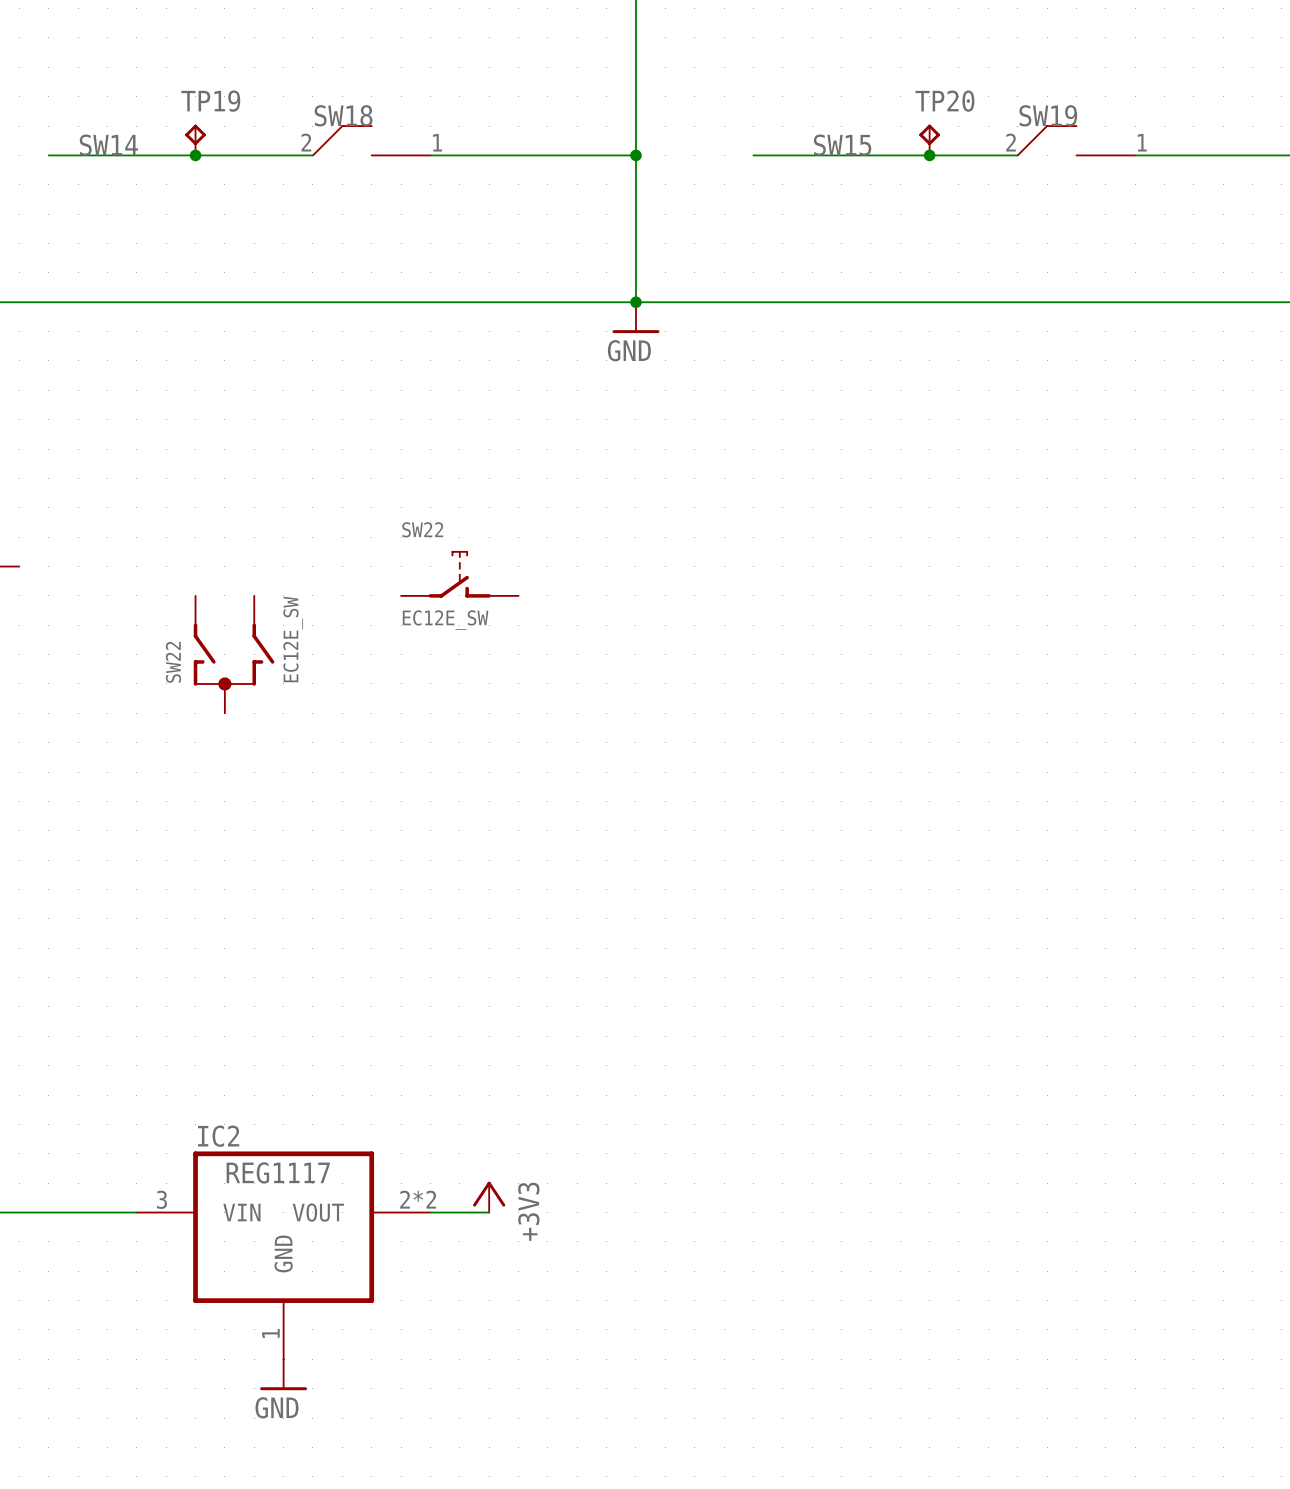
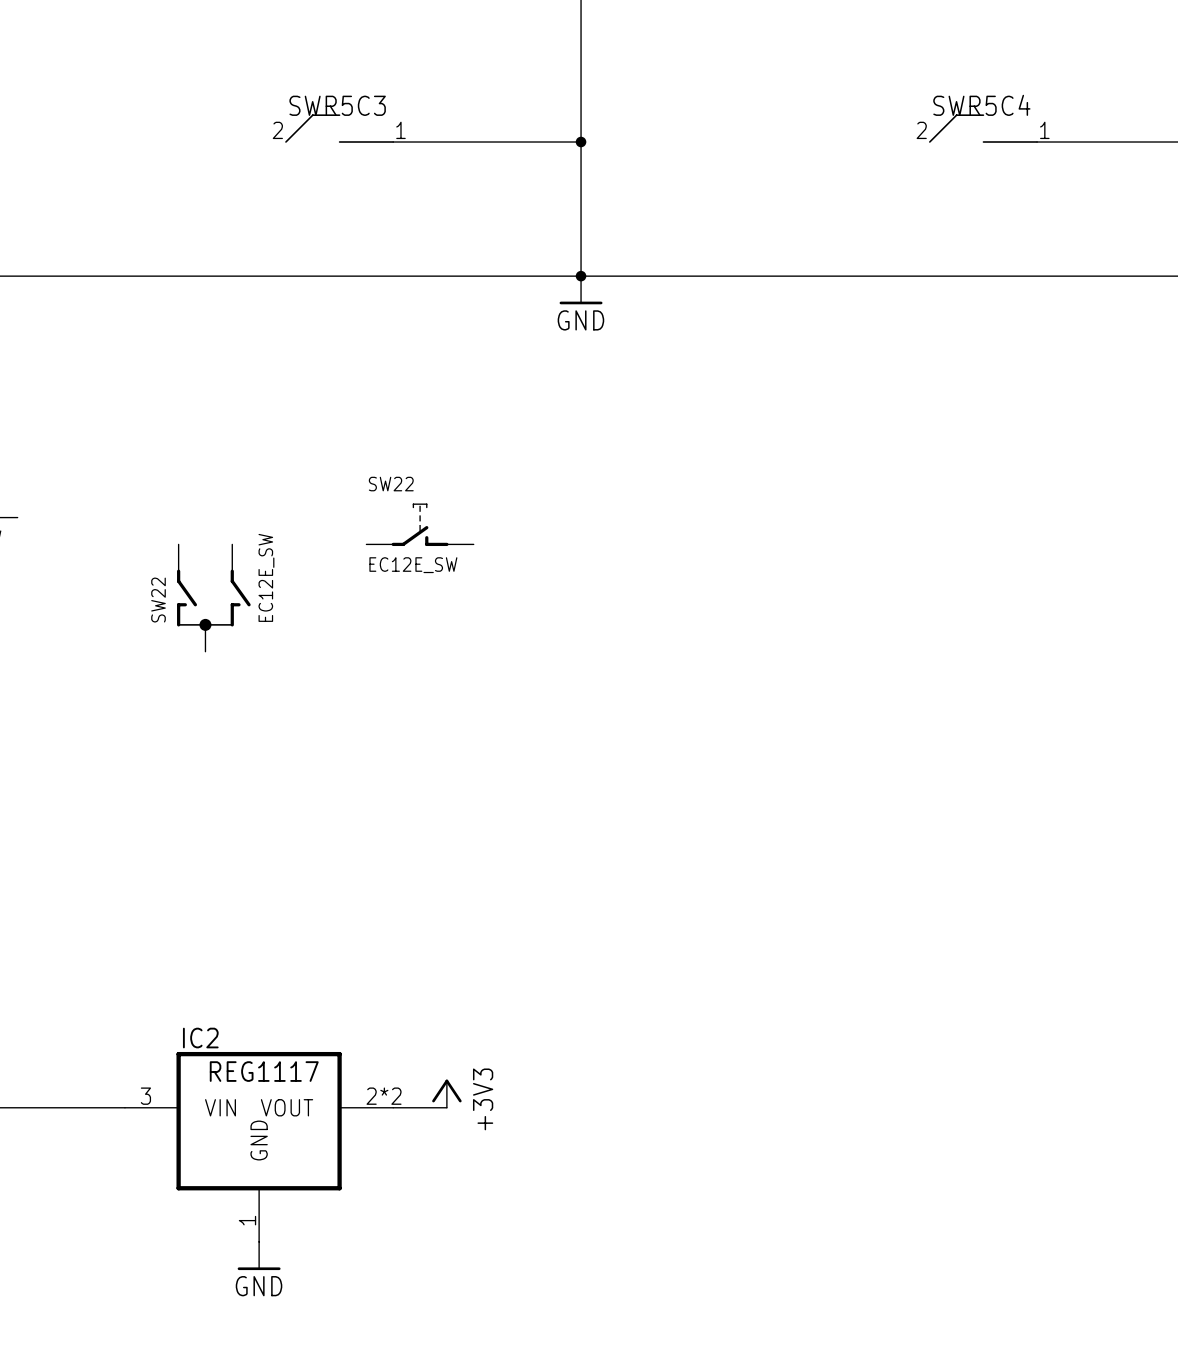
SW18 name: SW18 (343, 115) -> SWR5C3 (337, 105)
SW19 name: SW19 (1048, 115) -> SWR5C4 (981, 105)
TP19: (195, 140) -> none
TP20: (929, 140) -> none
label: SW14 (108, 145) -> none
label: SW15 (842, 145) -> none
wire: (48, 155) (312, 155) -> none
junction: (195, 155) -> none
wire: (753, 155) (1017, 155) -> none
junction: (929, 155) -> none

